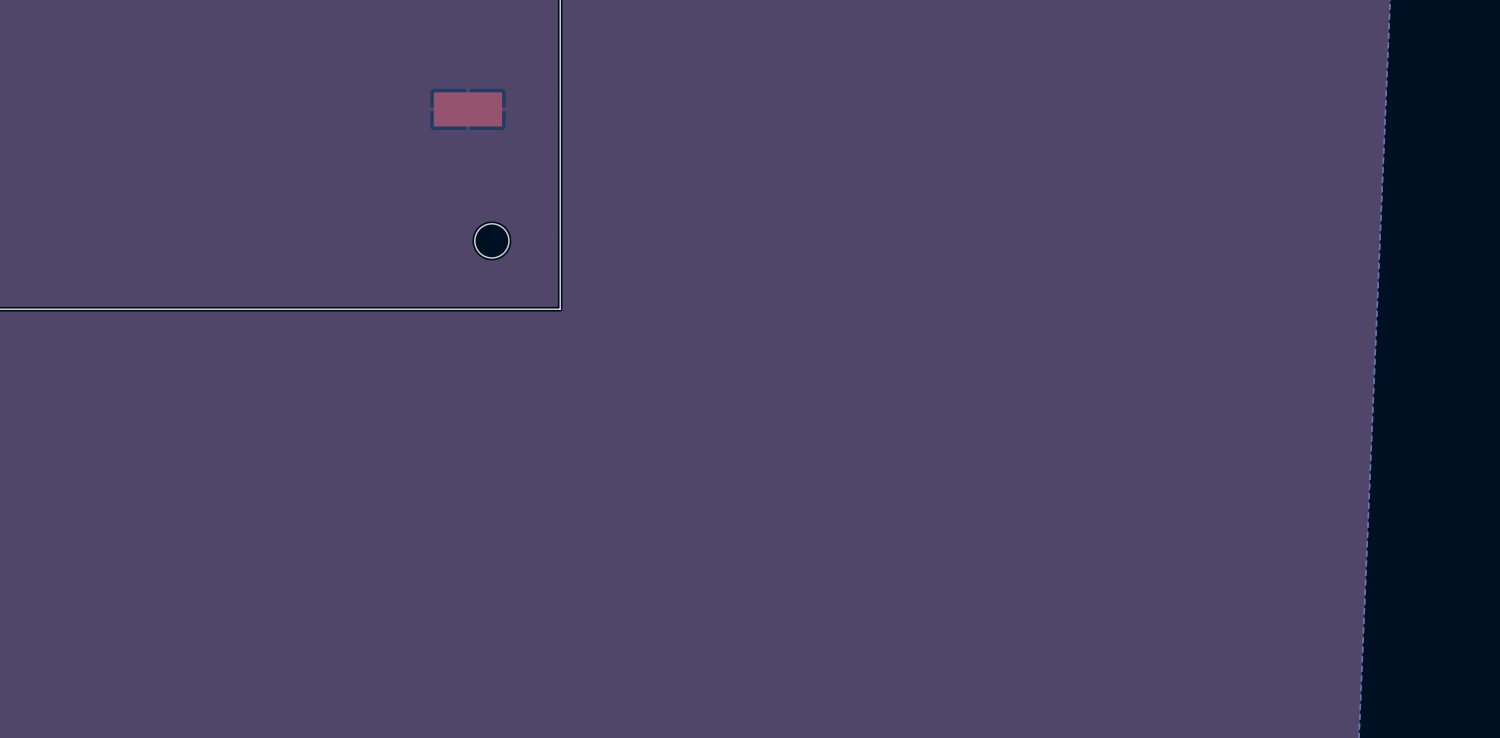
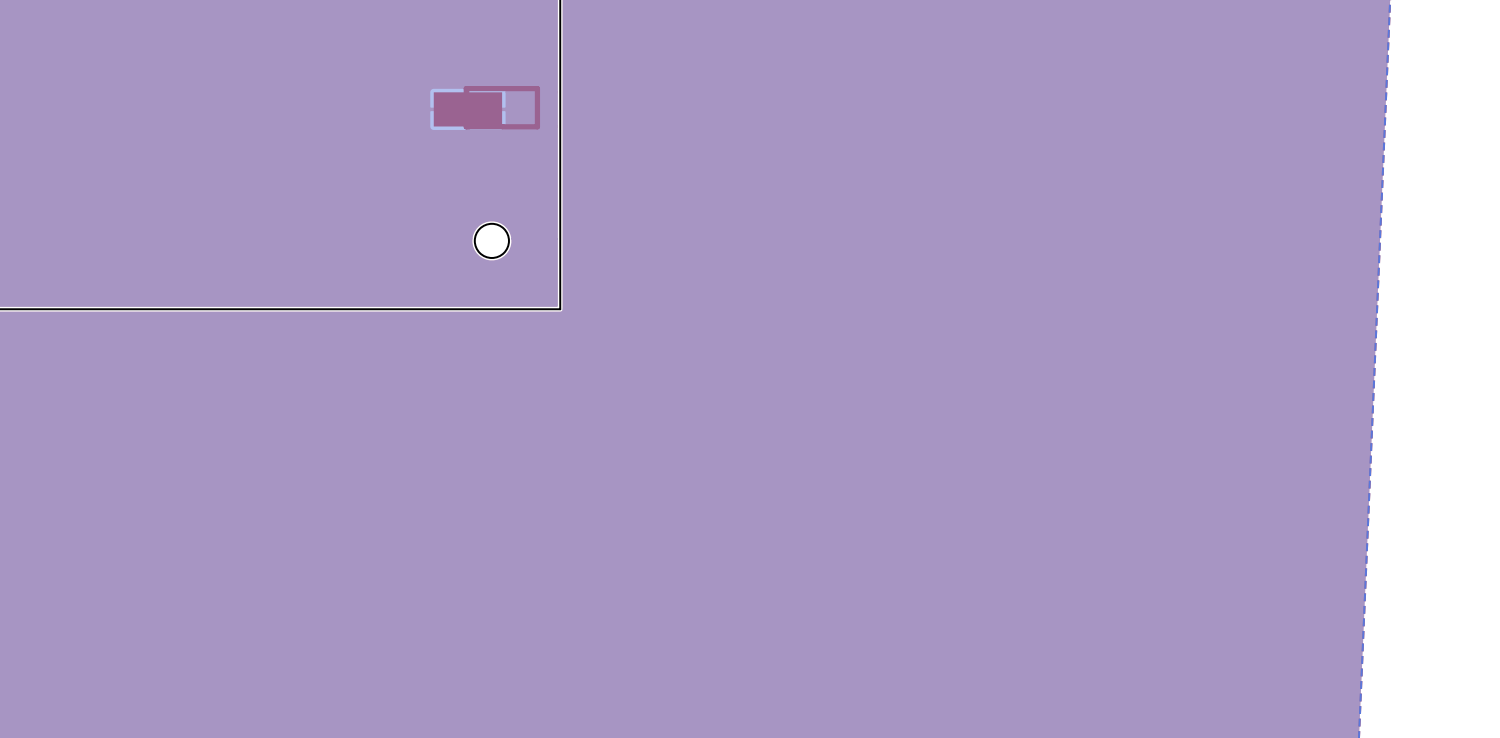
top track: none -> (537, 88) (537, 126) (466, 126) (466, 88) (537, 88)

